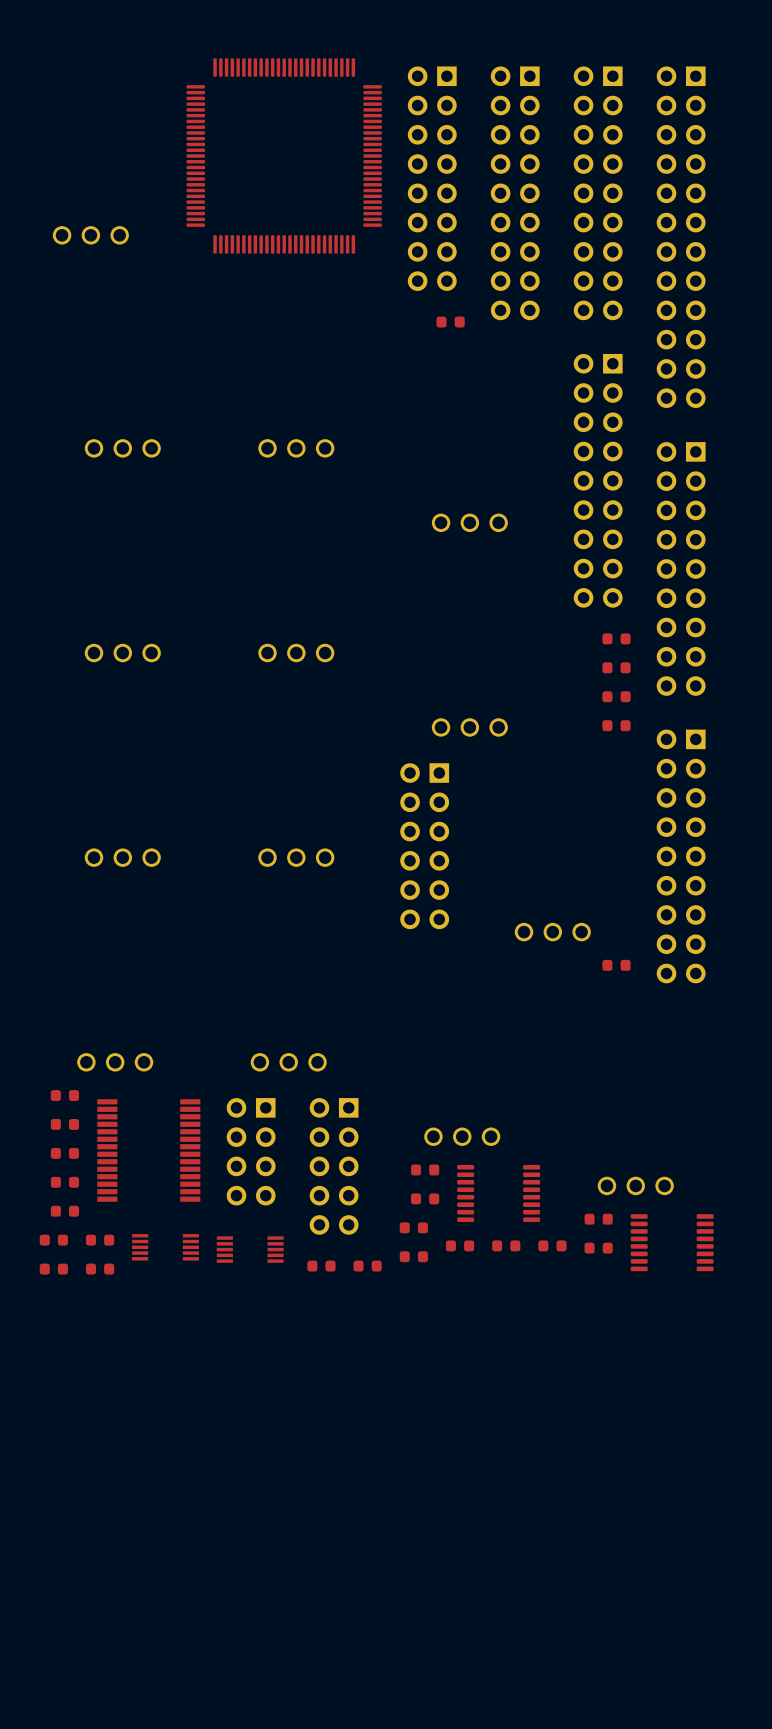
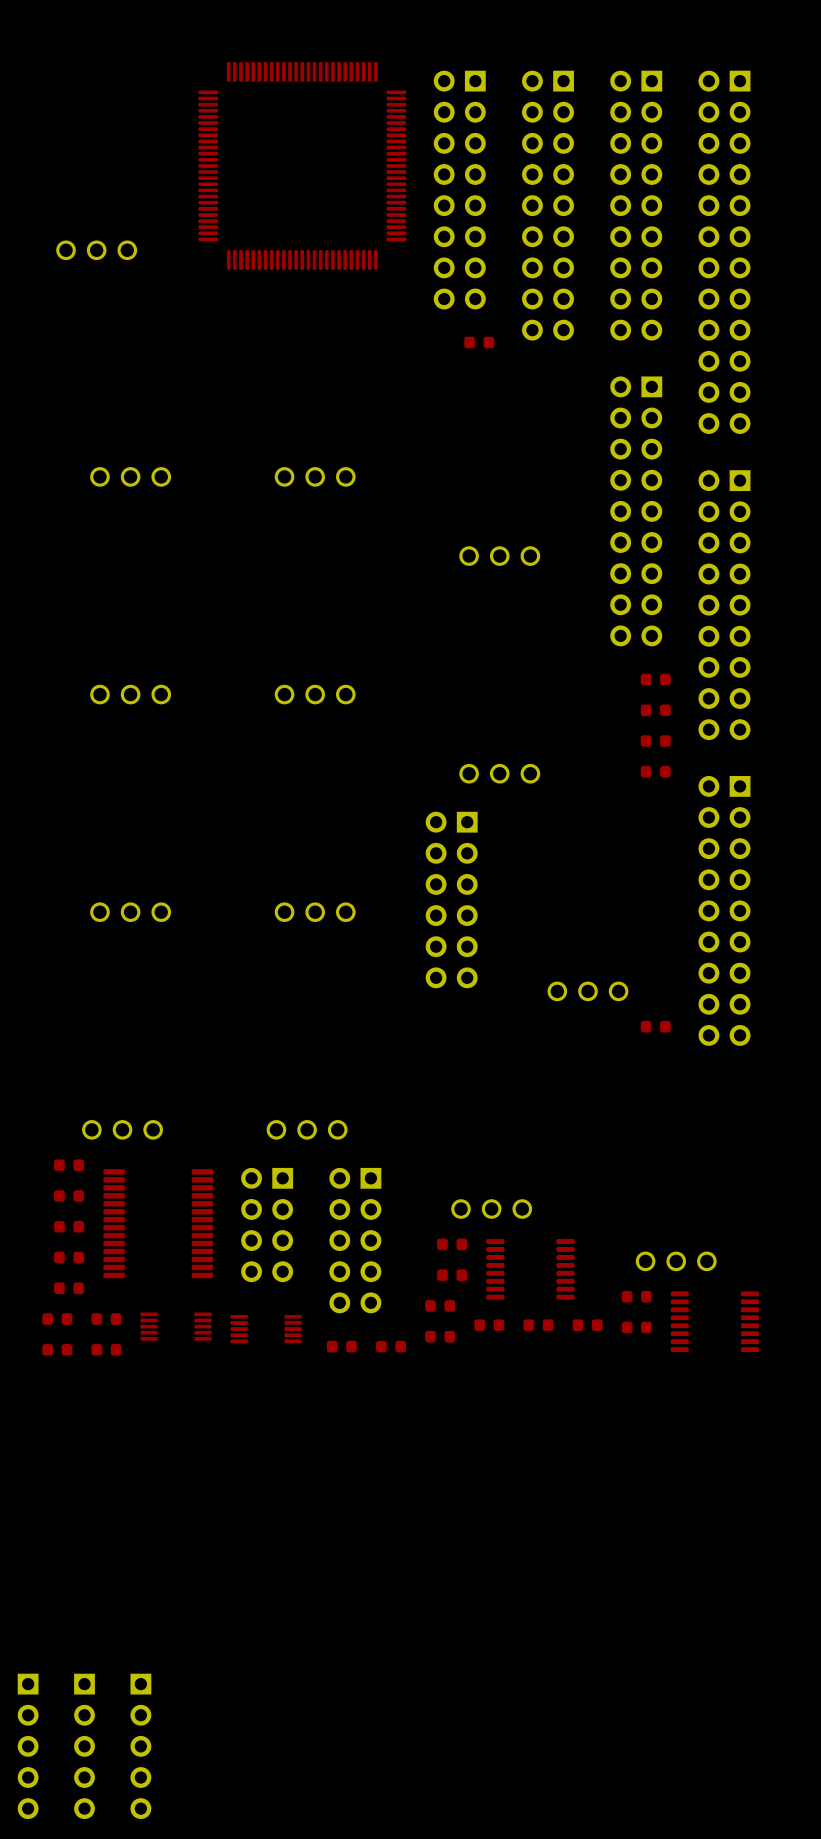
part: none -> (28, 1746)
part: none -> (84, 1746)
part: none -> (140, 1746)

